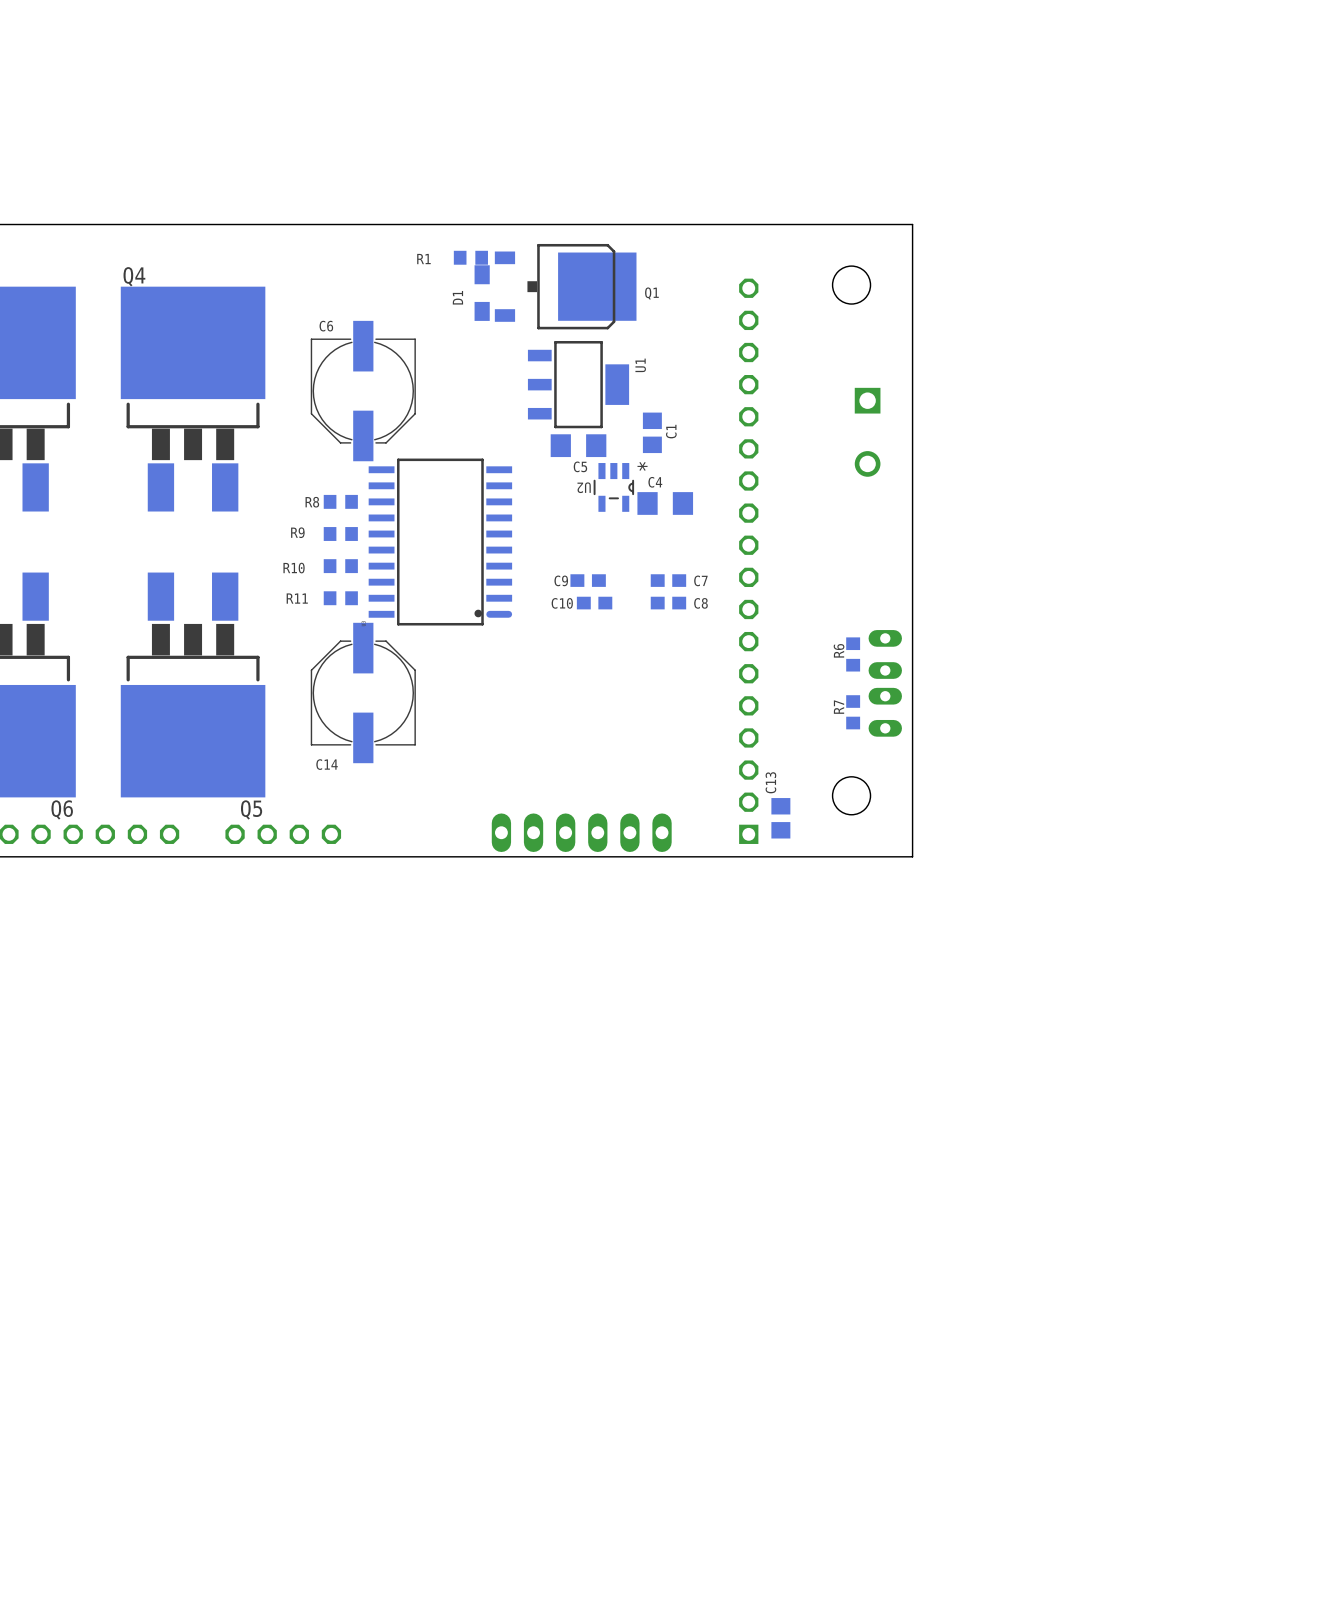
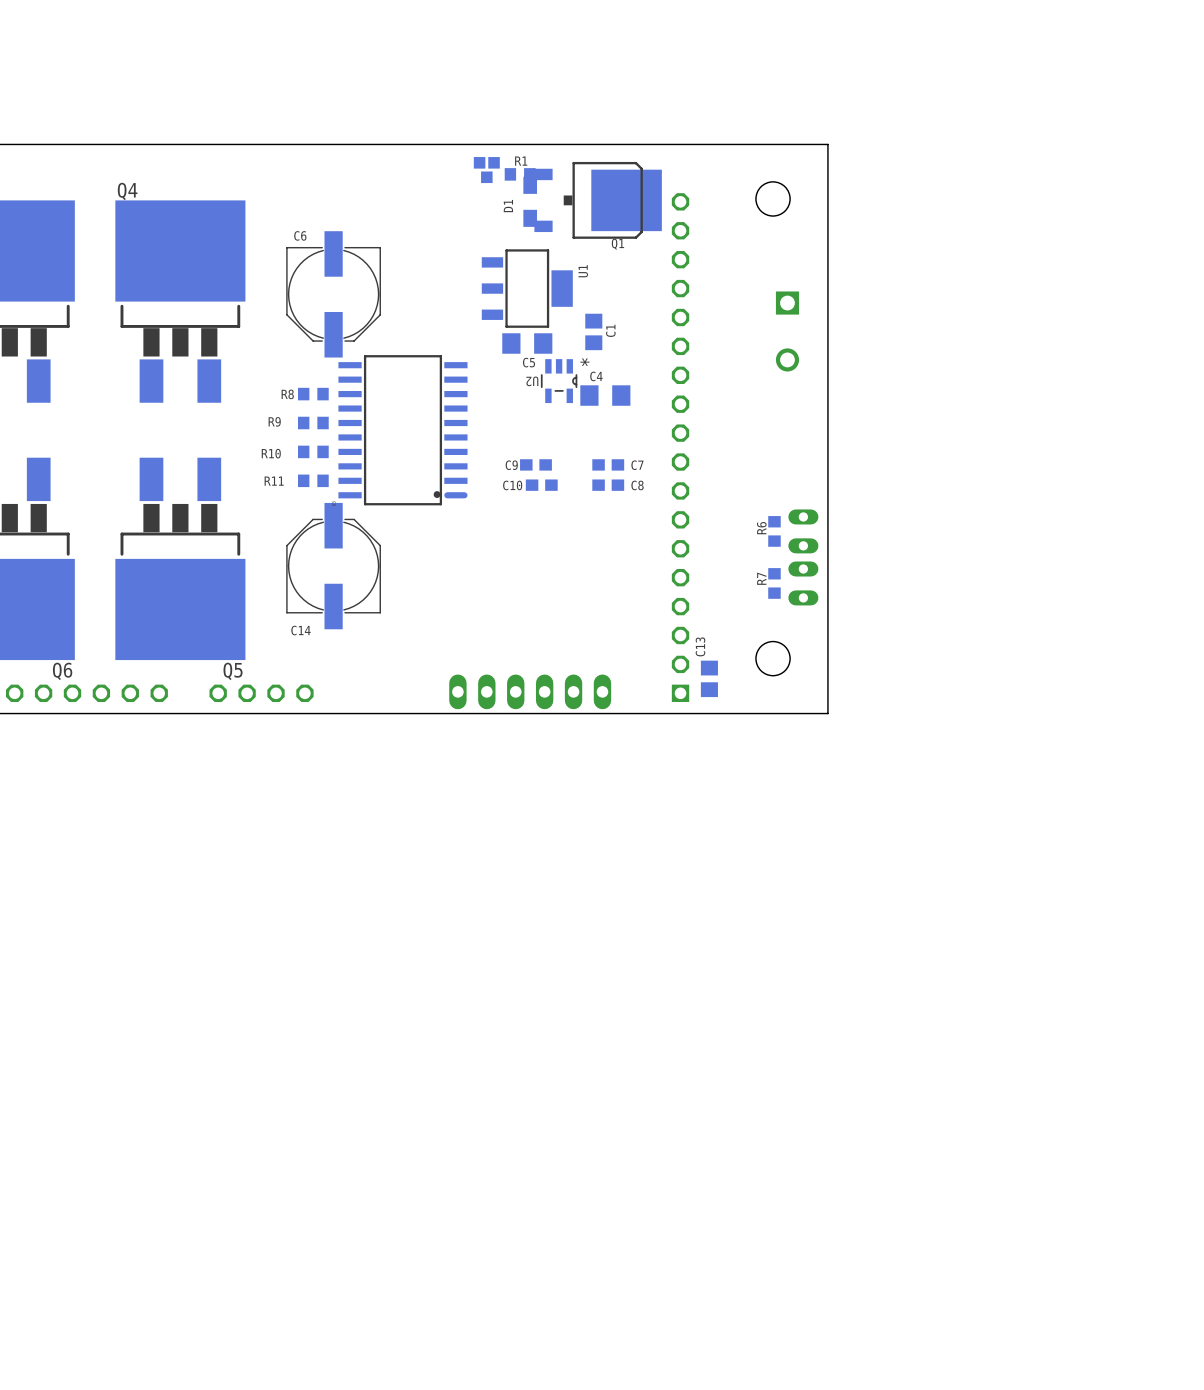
part: none -> (486, 170)
R1 position: (470, 257) -> (520, 174)
R1 name position: R1 (423, 259) -> R1 (521, 161)
Q1 position: (565, 286) -> (598, 200)
D1 position: (482, 293) -> (530, 201)
Q1 name position: Q1 (651, 293) -> Q1 (617, 244)

